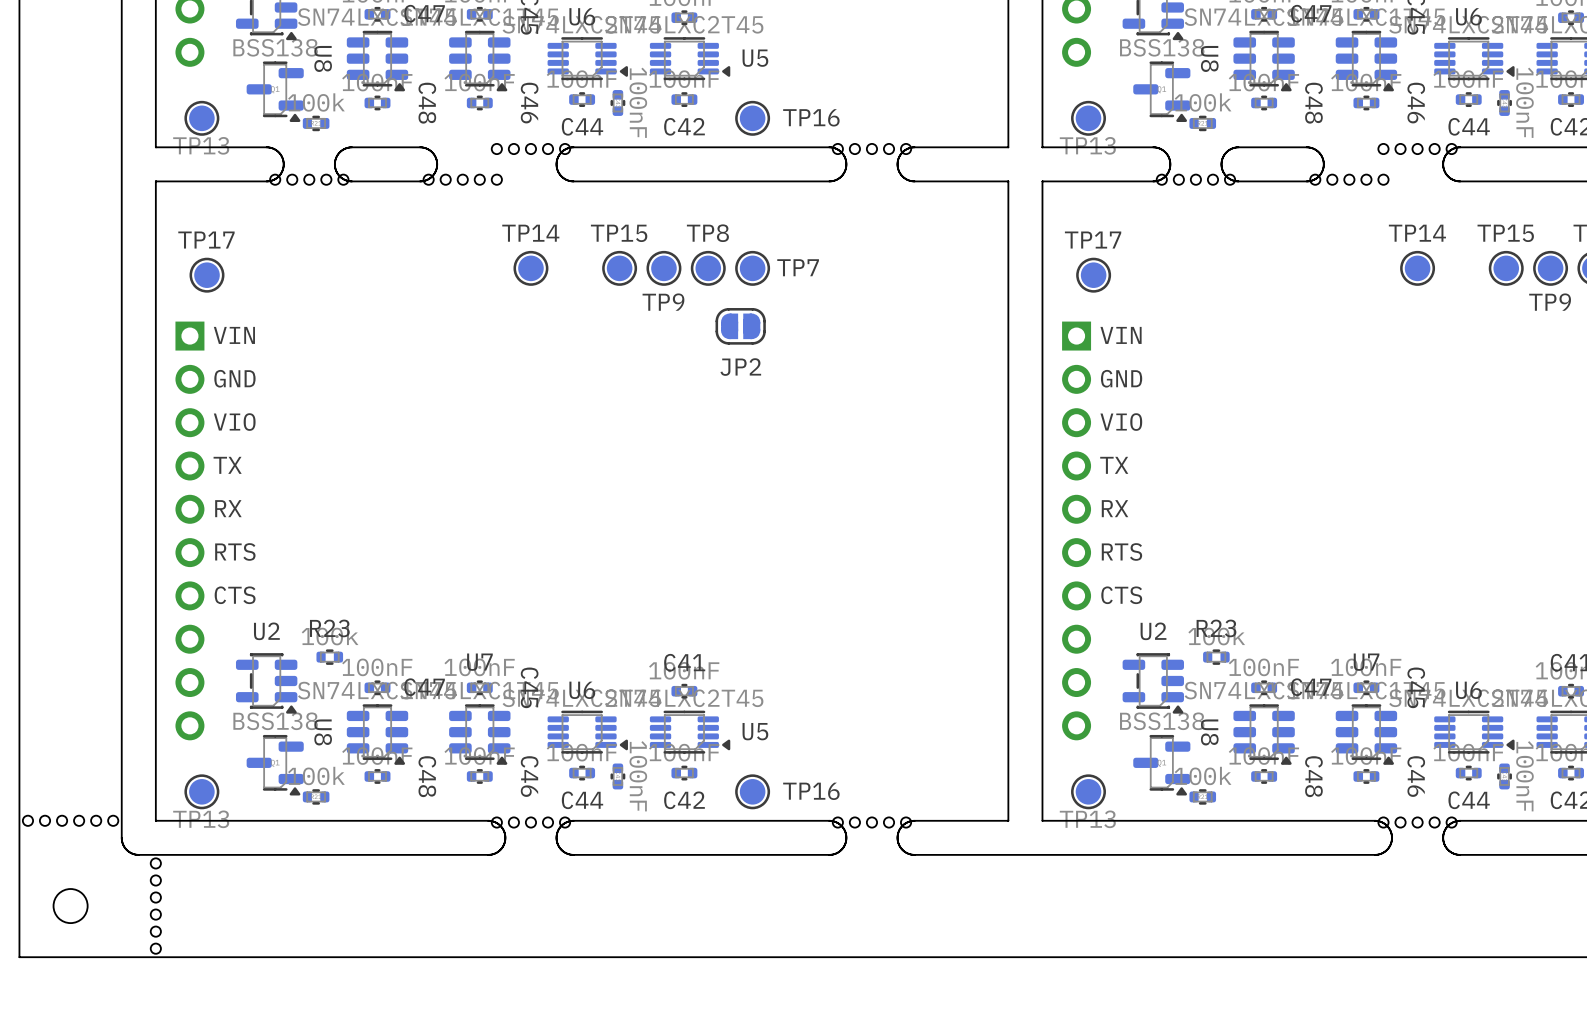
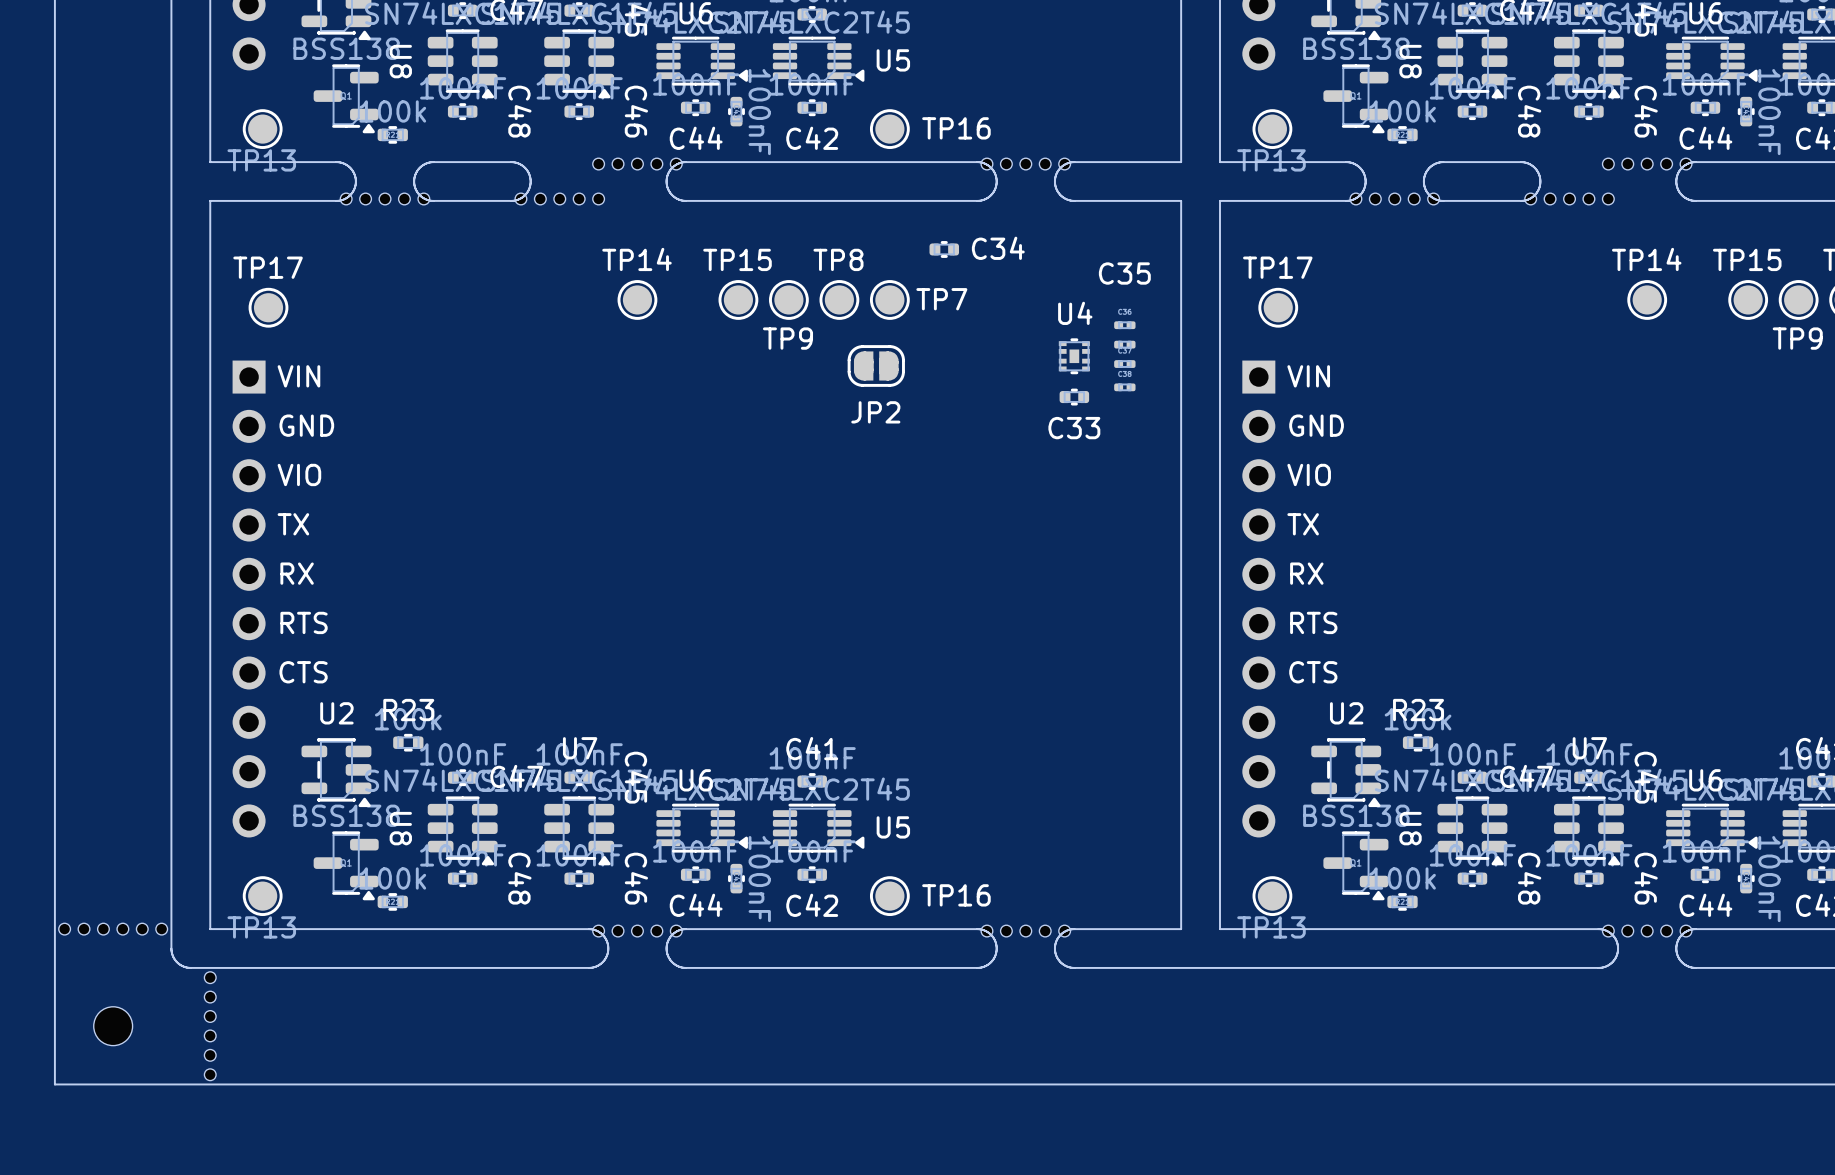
C34: none -> (944, 249)
part: none -> (1124, 325)
C35: none -> (1124, 344)
U4: none -> (1074, 356)
part: none -> (1124, 364)
part: none -> (1124, 387)
C33: none -> (1074, 397)

